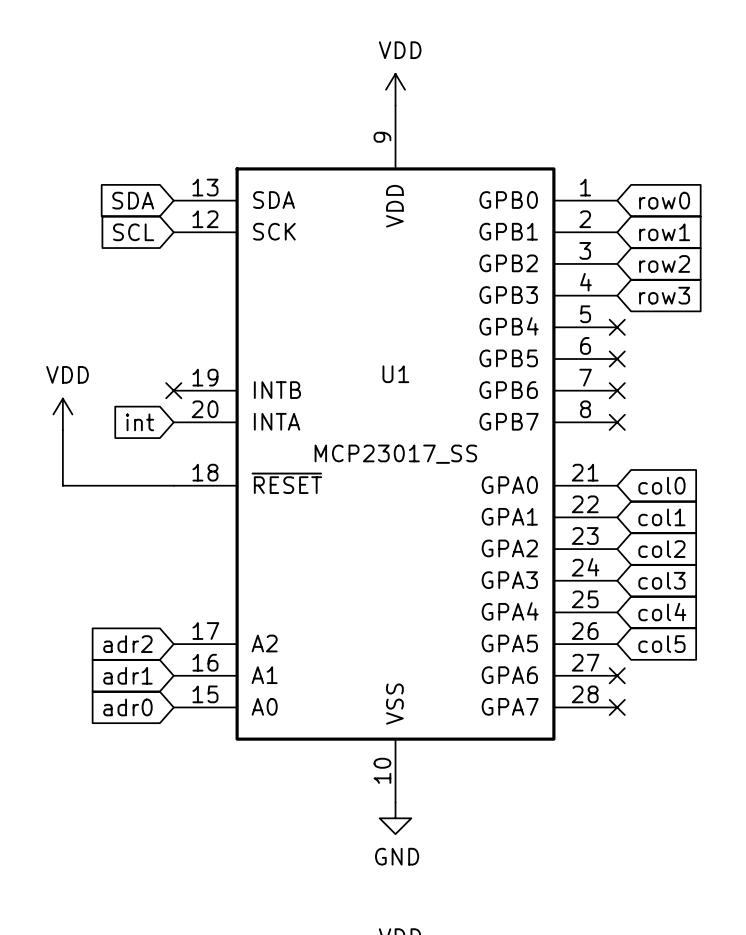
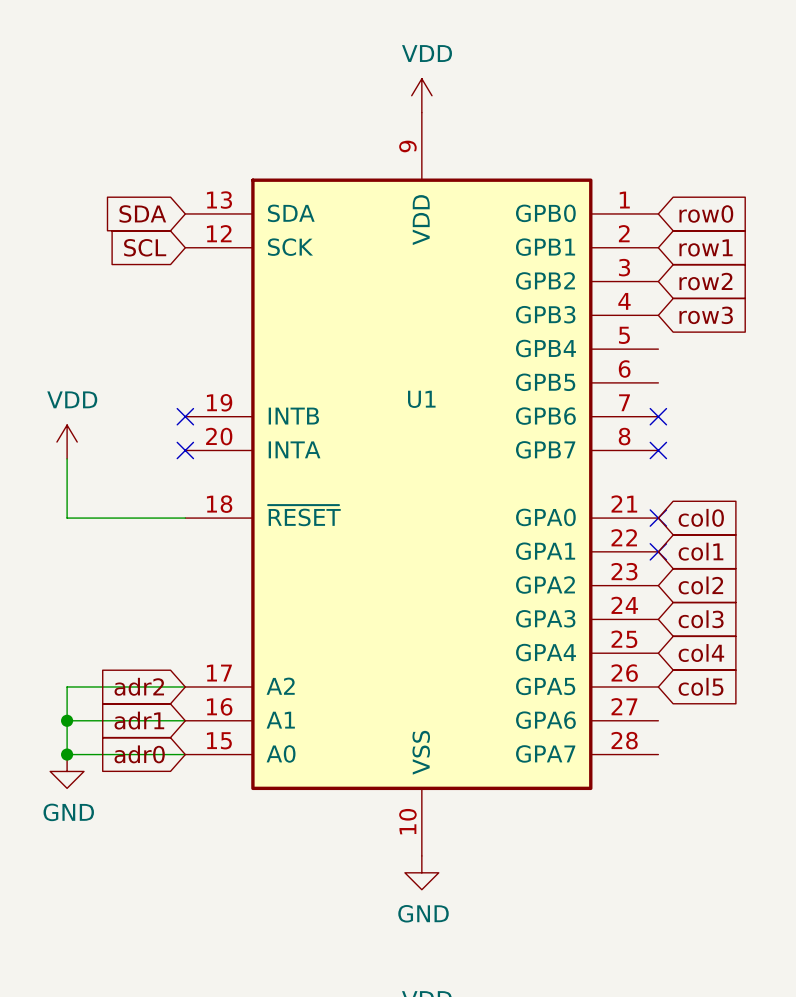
no-connect mark: (617, 327) -> none
no-connect mark: (617, 359) -> none
global label: int (139, 422) -> none
no-connect mark: none -> (185, 450)
U1 value: MCP23017_SS (395, 454) -> none
no-connect mark: none -> (658, 518)
no-connect mark: none -> (658, 551)
wire: none -> (185, 686) (67, 686) (67, 754) (185, 754)
wire: none -> (67, 720) (185, 720)
junction: none -> (67, 720)
no-connect mark: (617, 675) -> none
junction: none -> (67, 754)
no-connect mark: (617, 707) -> none
power symbol: none -> GND (67, 771)

